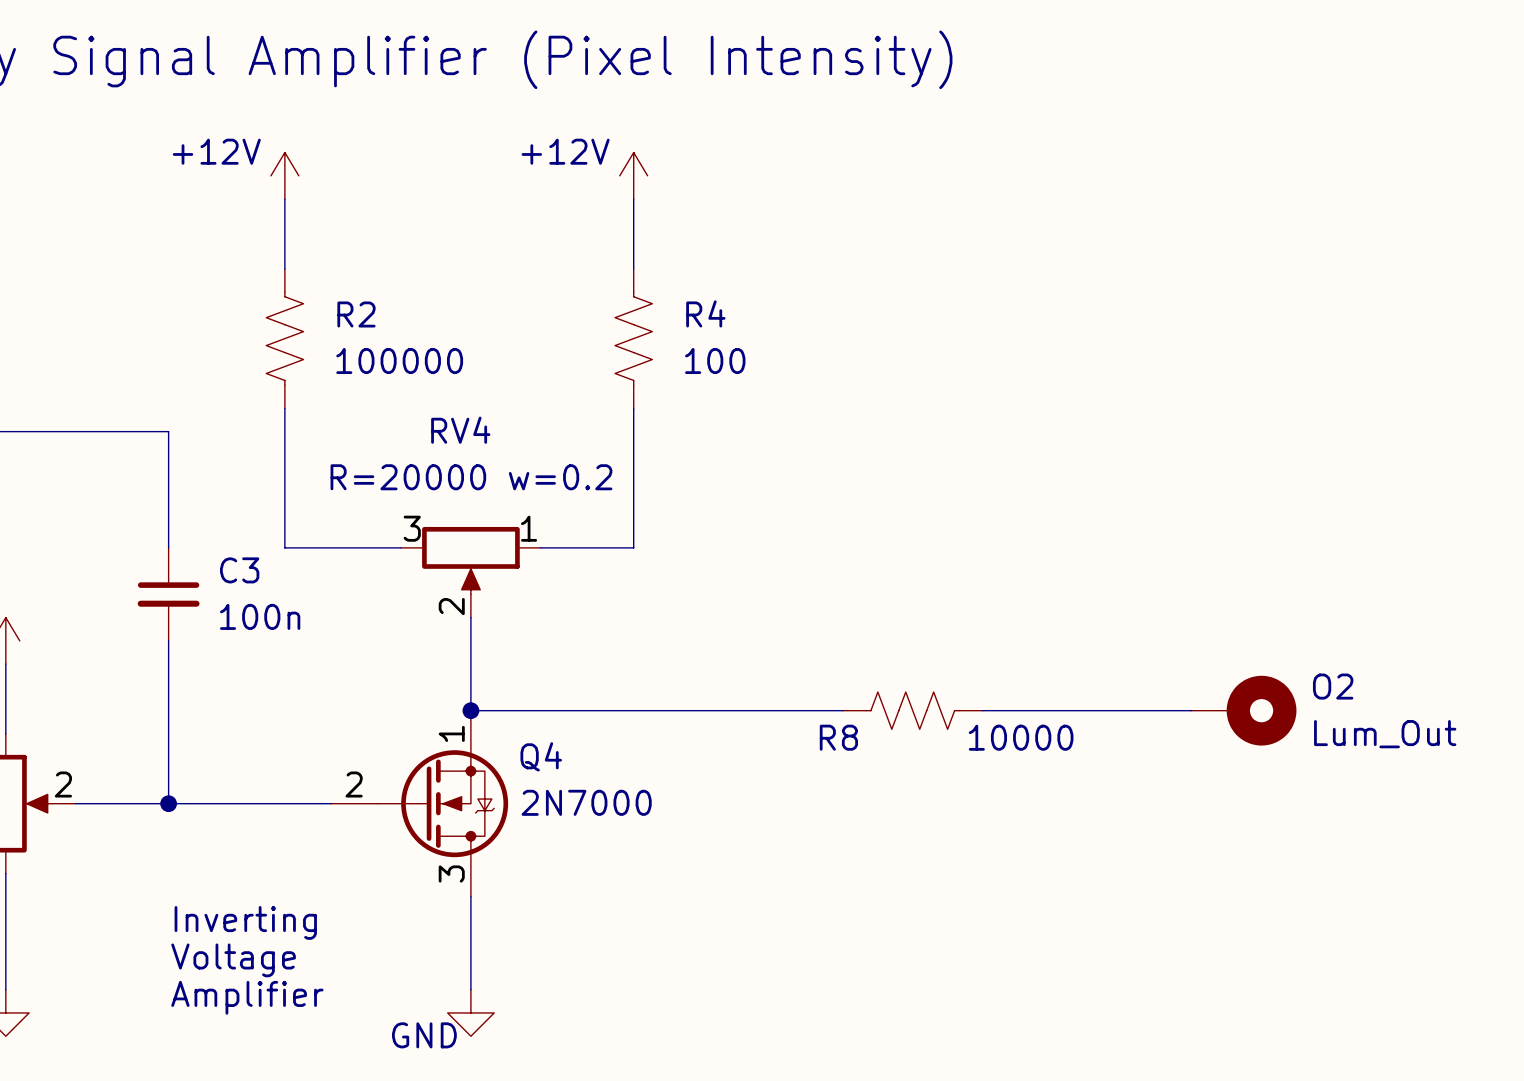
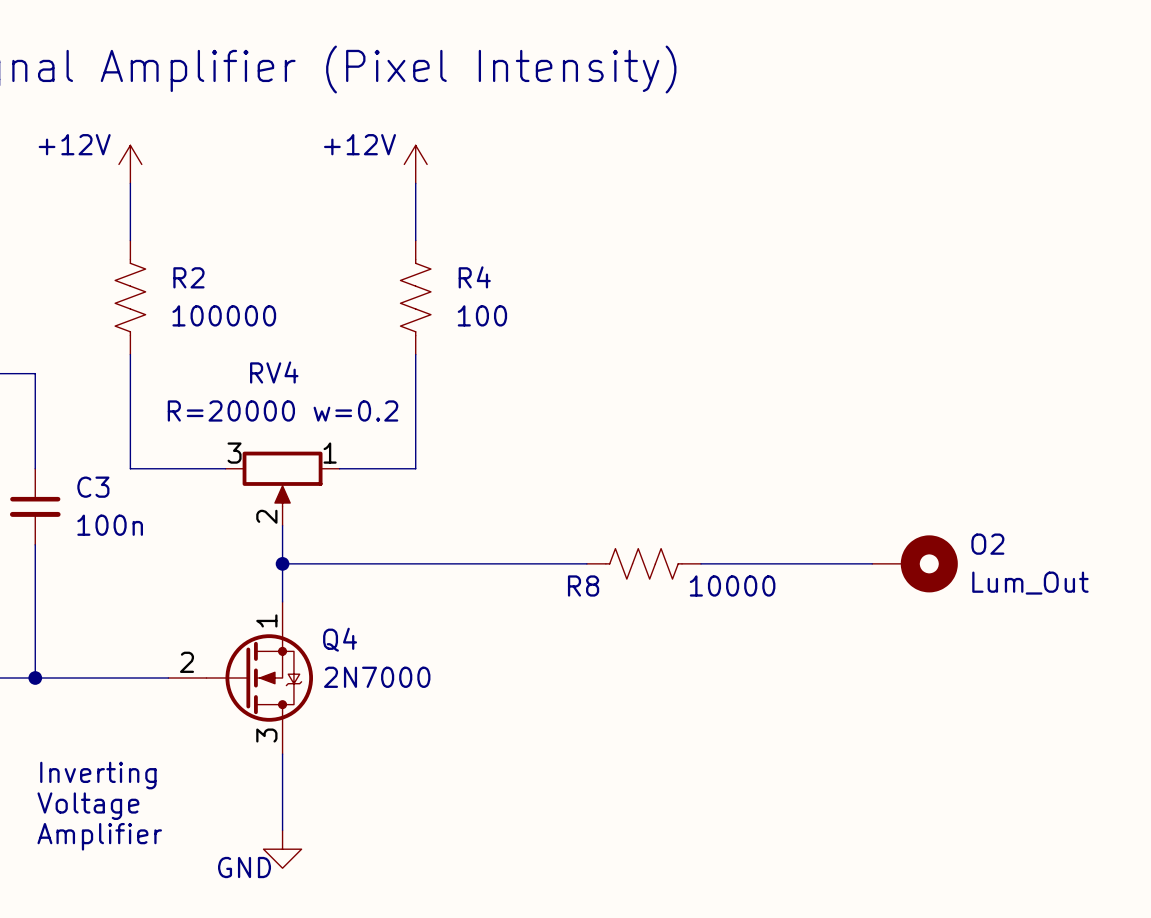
wire: (470, 710) (842, 710) -> (282, 563) (586, 563)
junction position: (470, 710) -> (282, 563)
R8 position: (912, 710) -> (643, 563)
wire: (982, 710) (1191, 710) -> (701, 563) (872, 563)
O2 position: (1244, 710) -> (915, 563)

